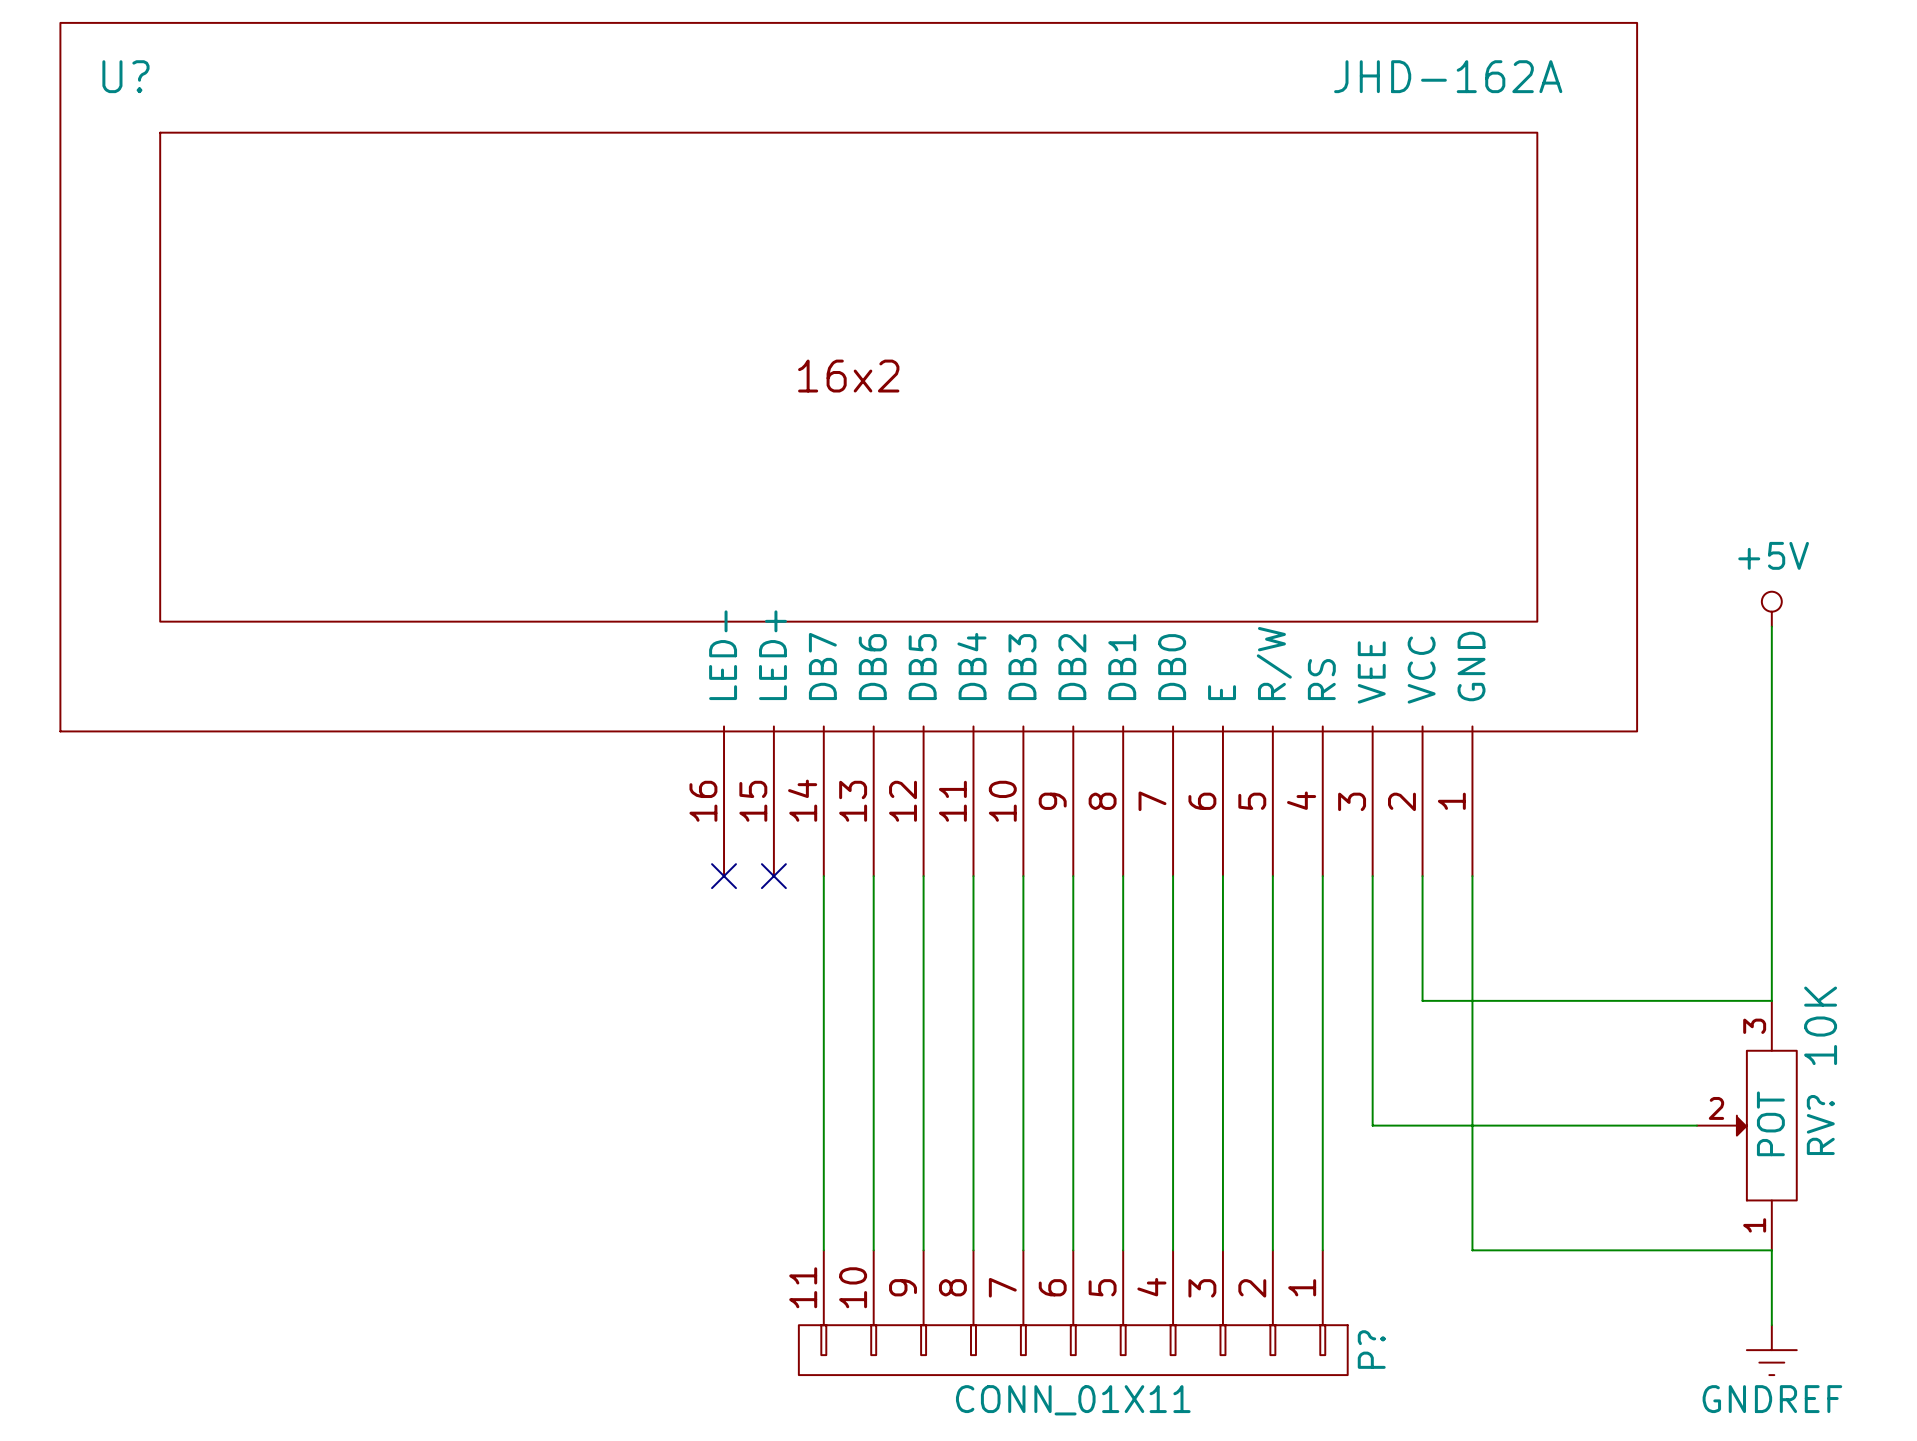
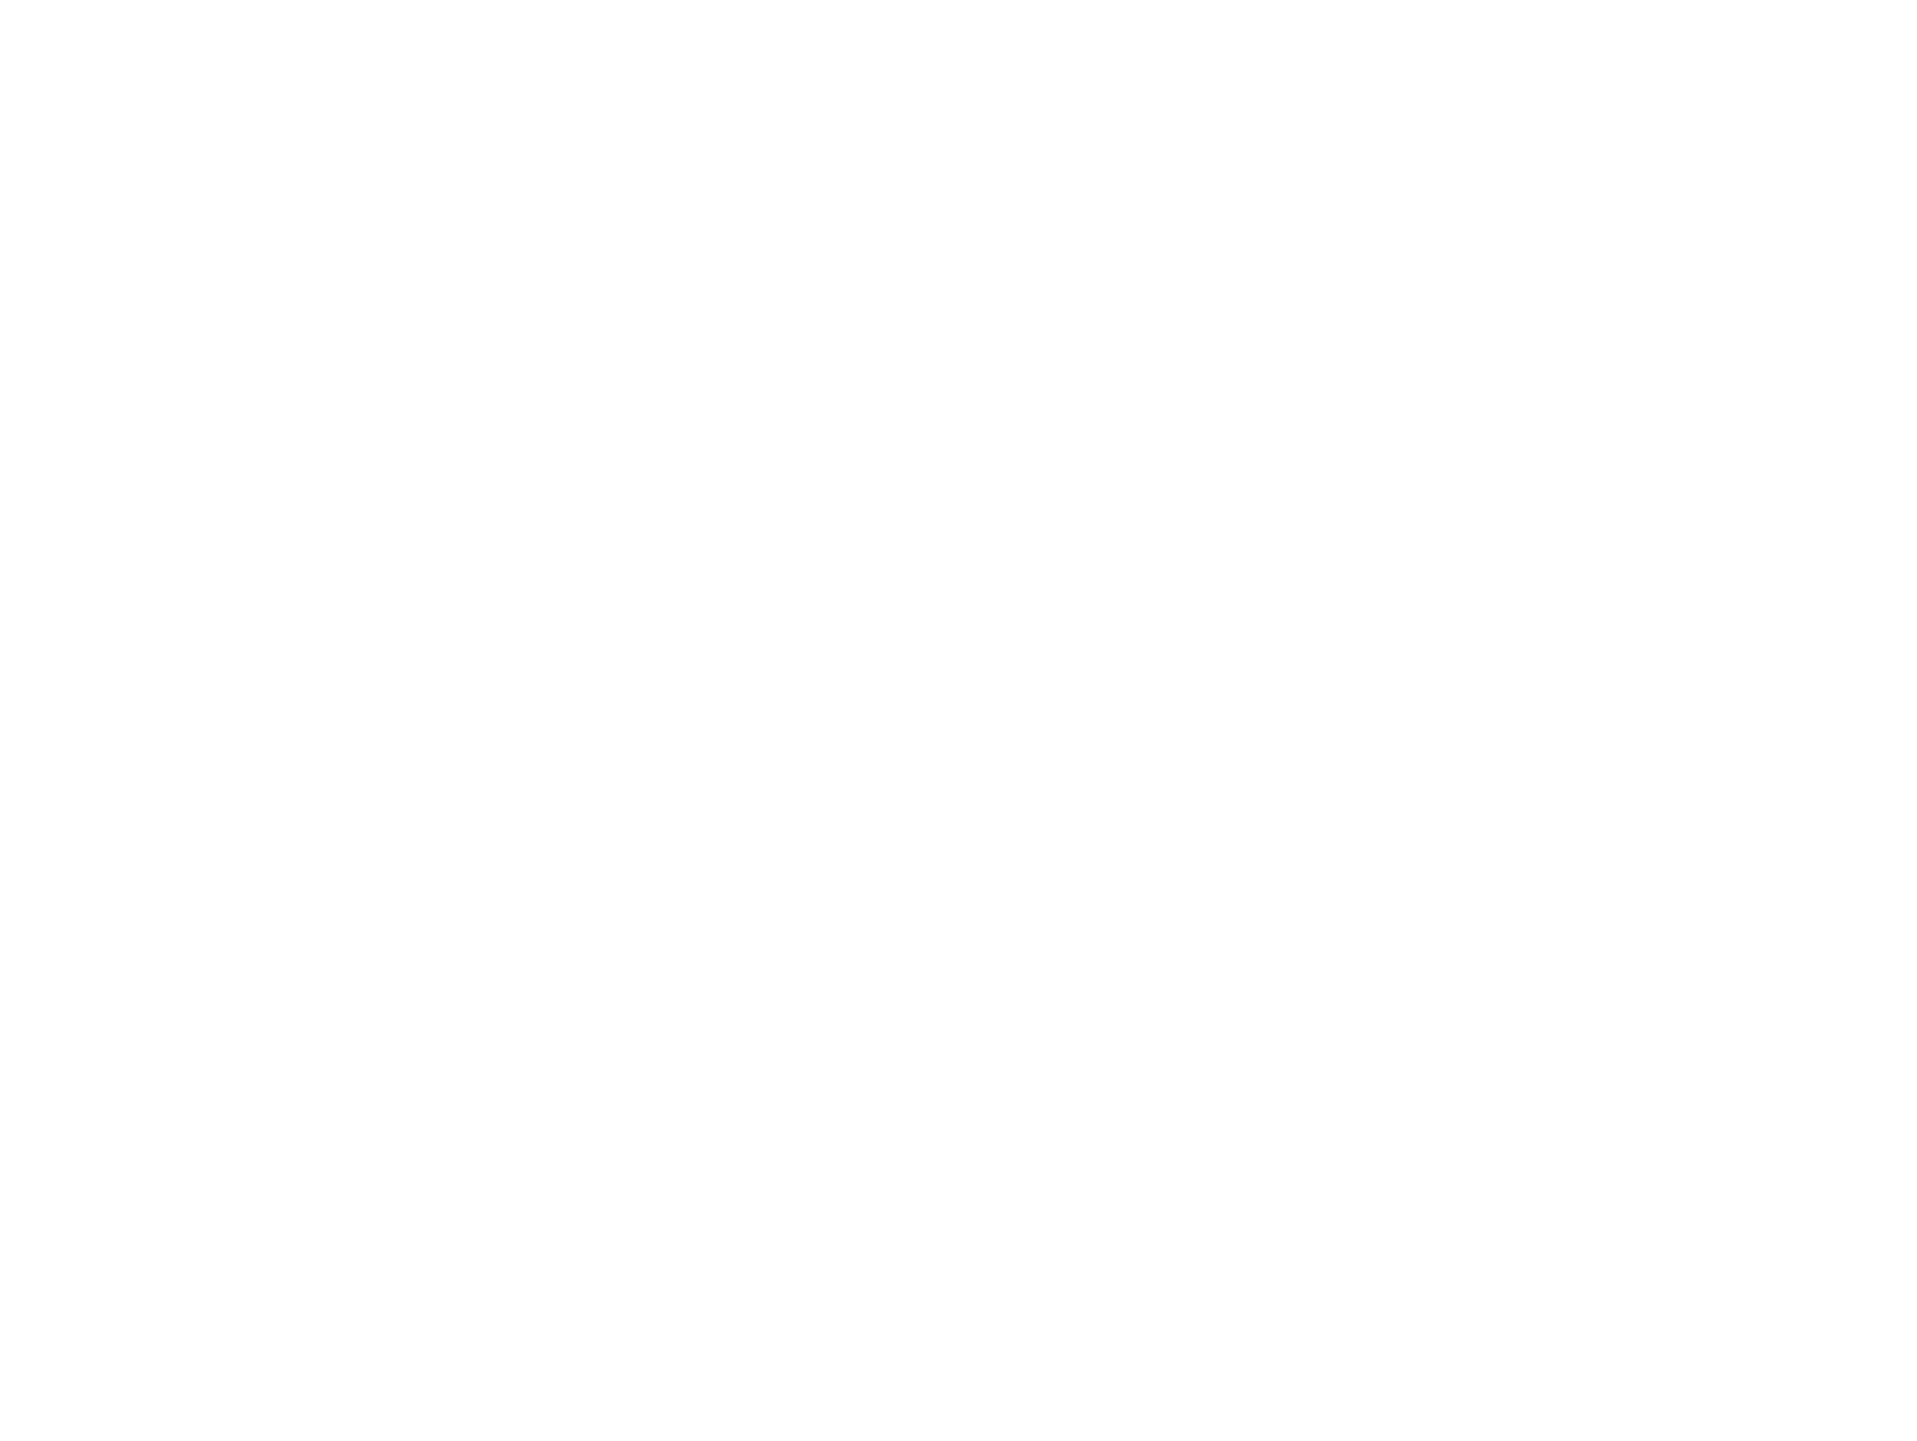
U?: JHD-162A (848, 449) -> none
power symbol: +5V (1771, 609) -> none
wire: (1771, 626) (1771, 1000) (1422, 1000) (1422, 876) -> none
no-connect mark: (724, 876) -> none
no-connect mark: (773, 876) -> none
wire: (823, 876) (823, 1250) -> none
wire: (873, 876) (873, 1250) -> none
wire: (923, 876) (923, 1250) -> none
wire: (973, 876) (973, 1250) -> none
wire: (1023, 876) (1023, 1250) -> none
wire: (1073, 876) (1073, 1250) -> none
wire: (1123, 876) (1123, 1250) -> none
wire: (1173, 876) (1173, 1250) -> none
wire: (1222, 876) (1222, 1250) -> none
wire: (1272, 876) (1272, 1250) -> none
wire: (1322, 876) (1322, 1250) -> none
wire: (1372, 876) (1372, 1125) (1696, 1125) -> none
wire: (1472, 876) (1472, 1250) (1771, 1250) (1771, 1325) -> none
RV?: POT (1746, 1125) -> none
P?: CONN_01X11 (1073, 1312) -> none
power symbol: GNDREF (1771, 1350) -> none

